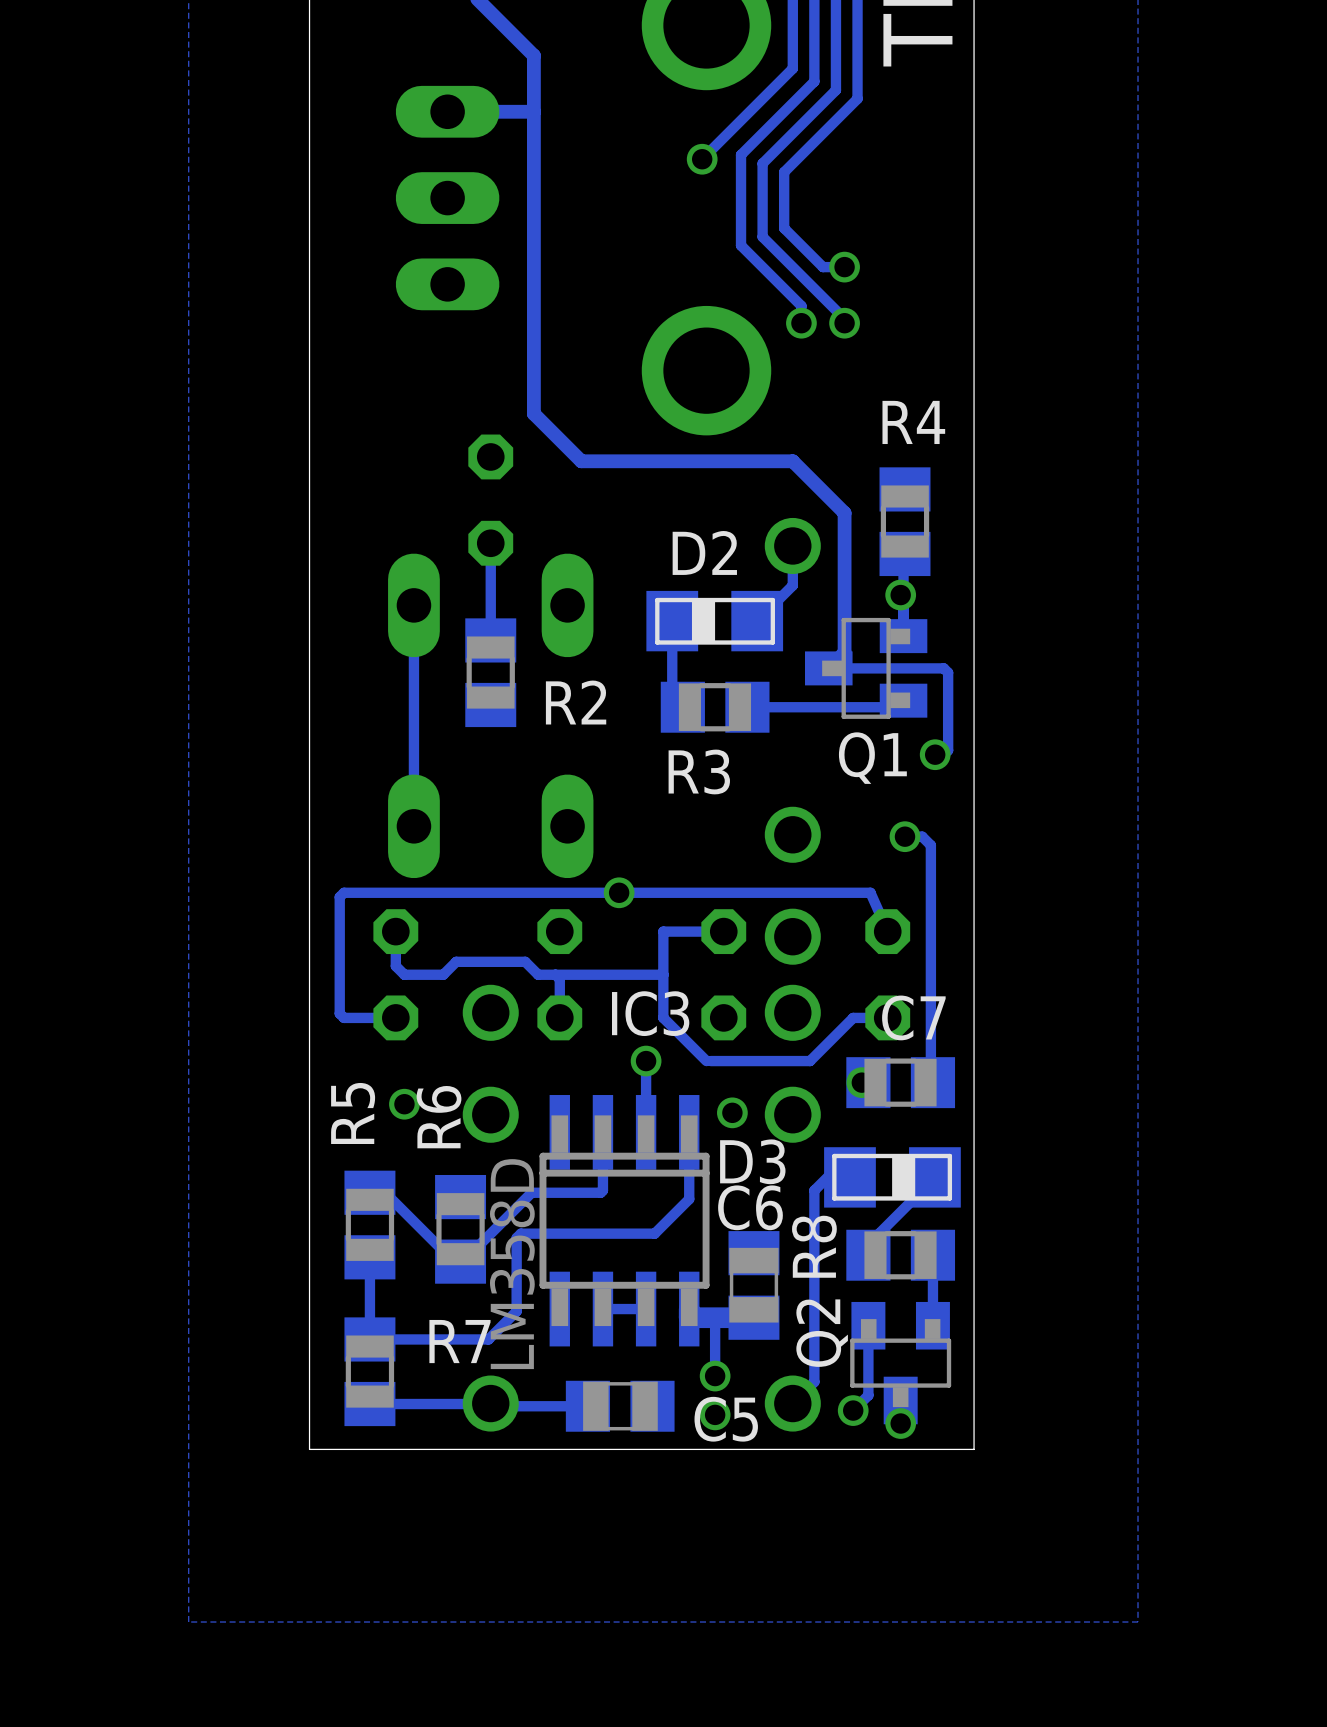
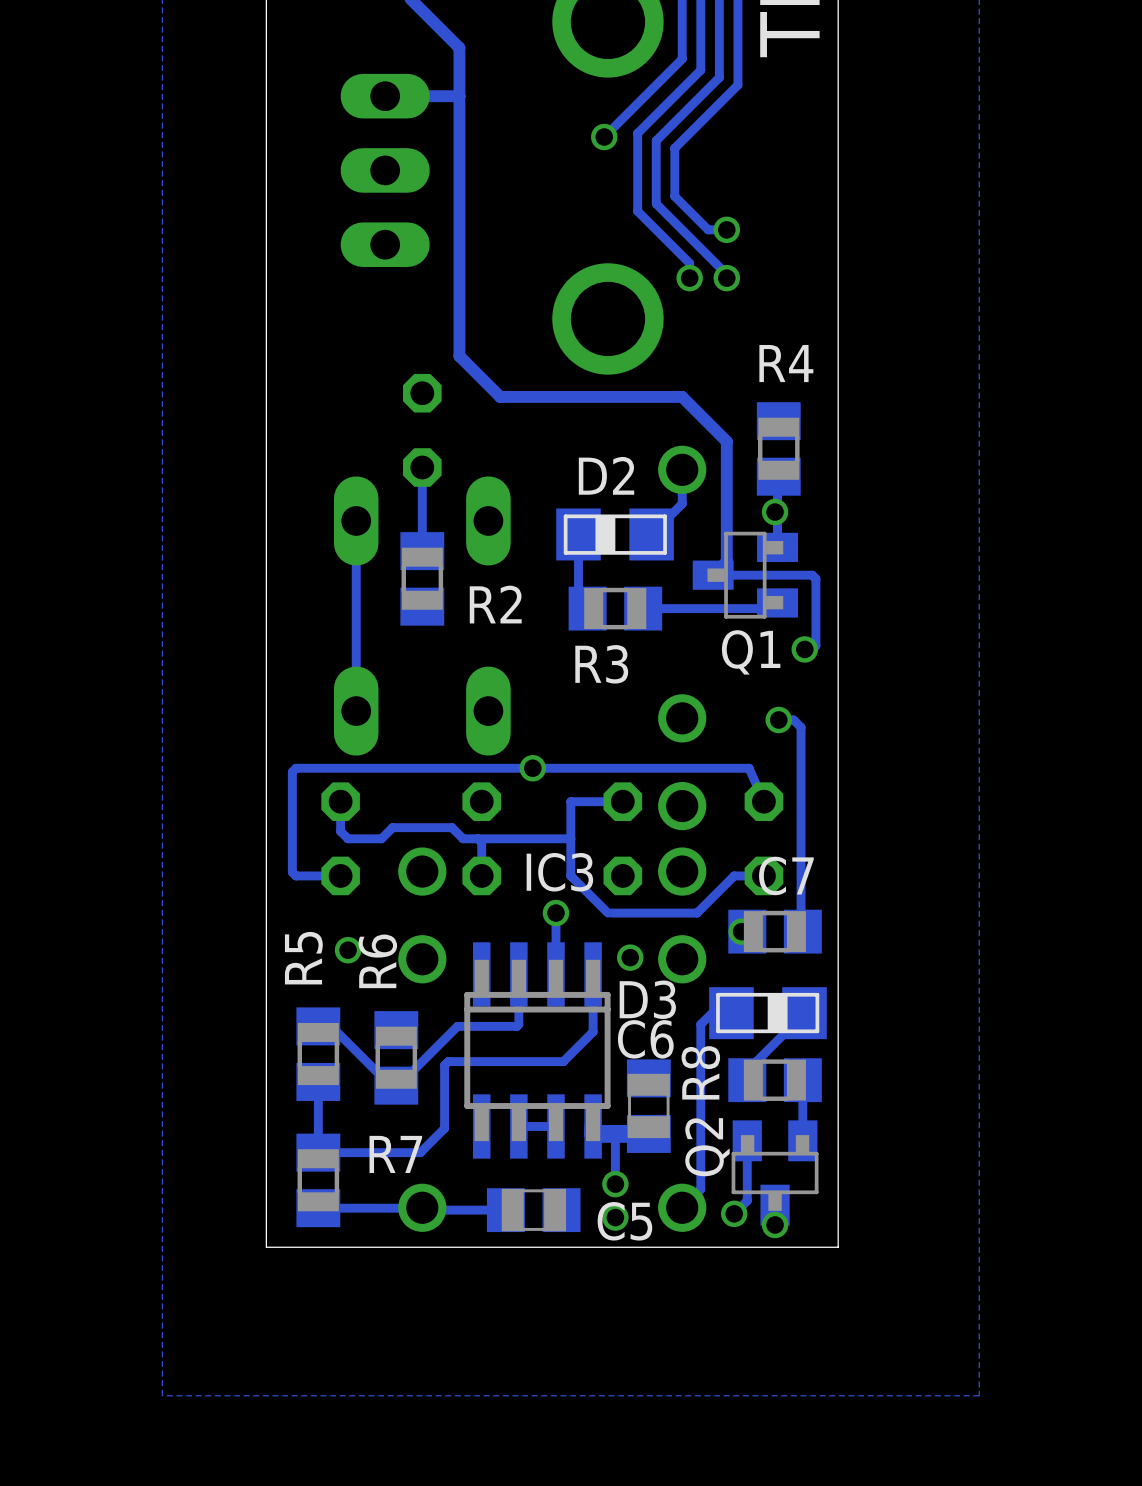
IC3 value: LM358D (512, 1264) -> none

